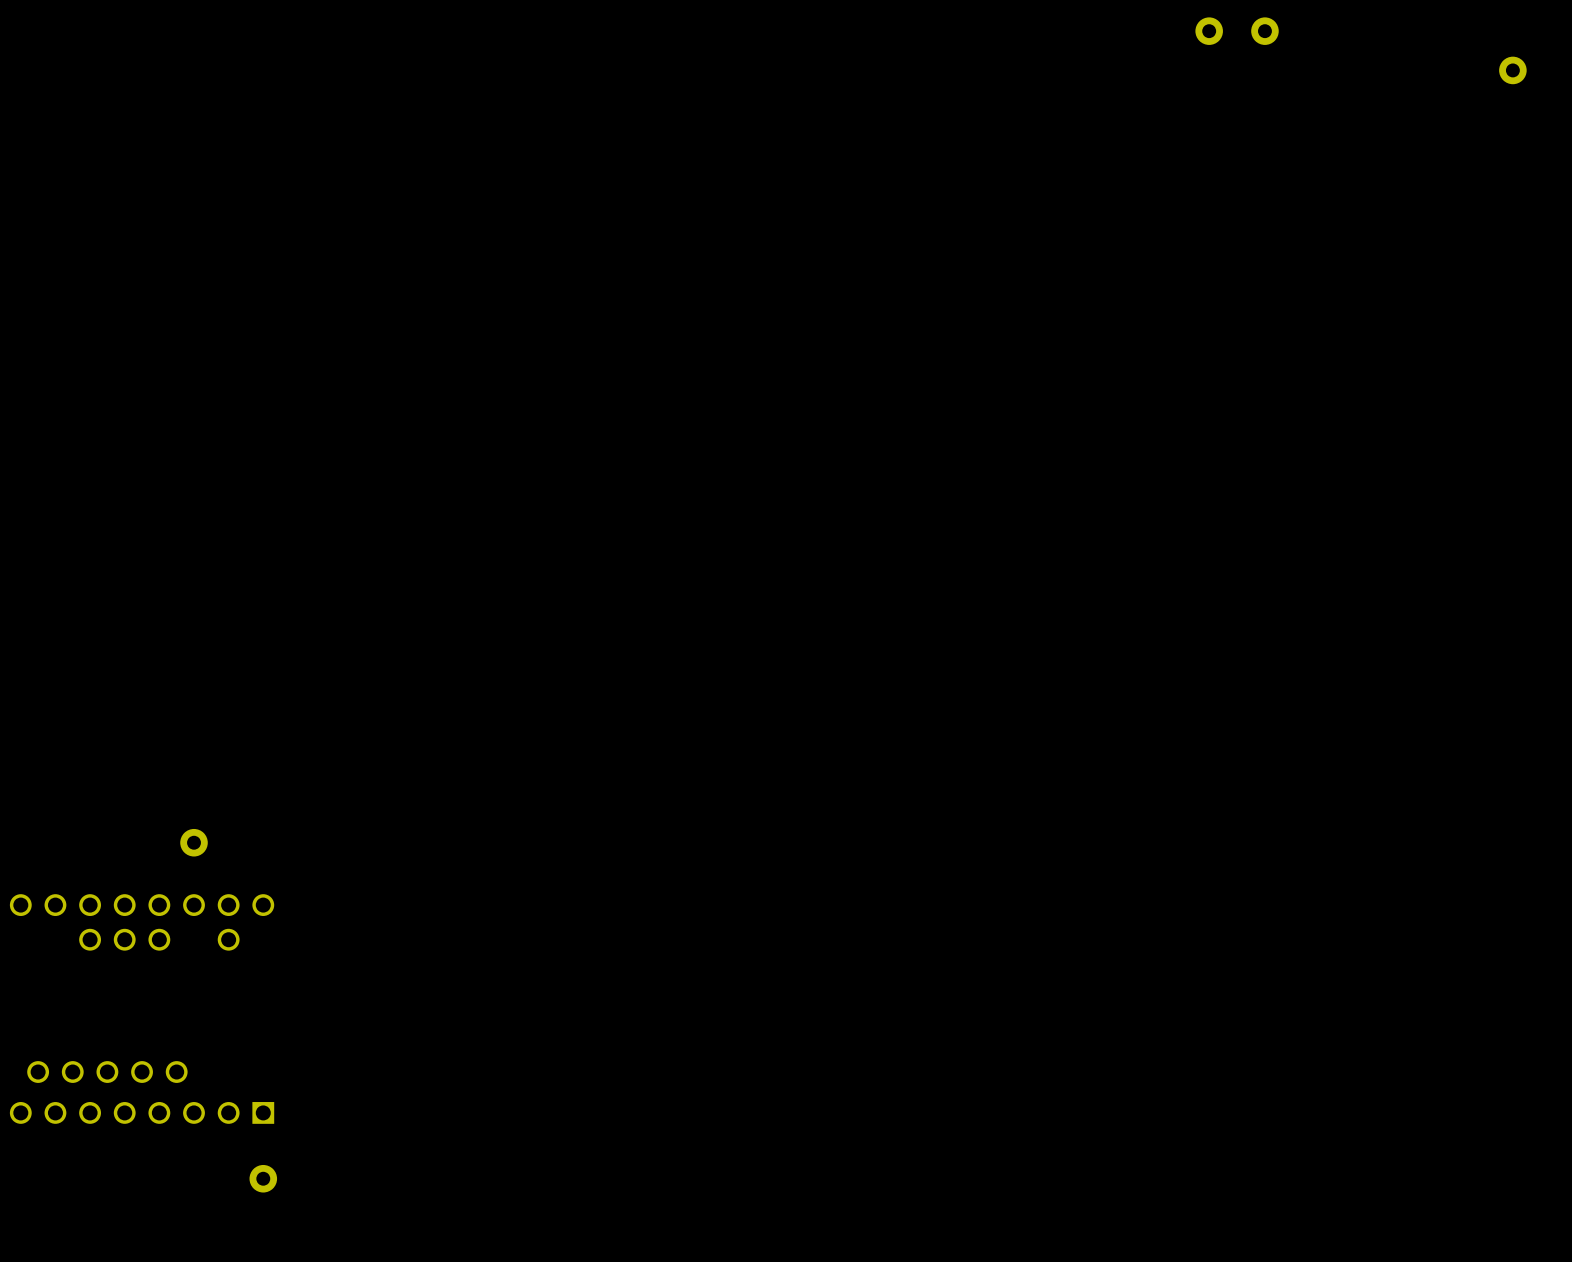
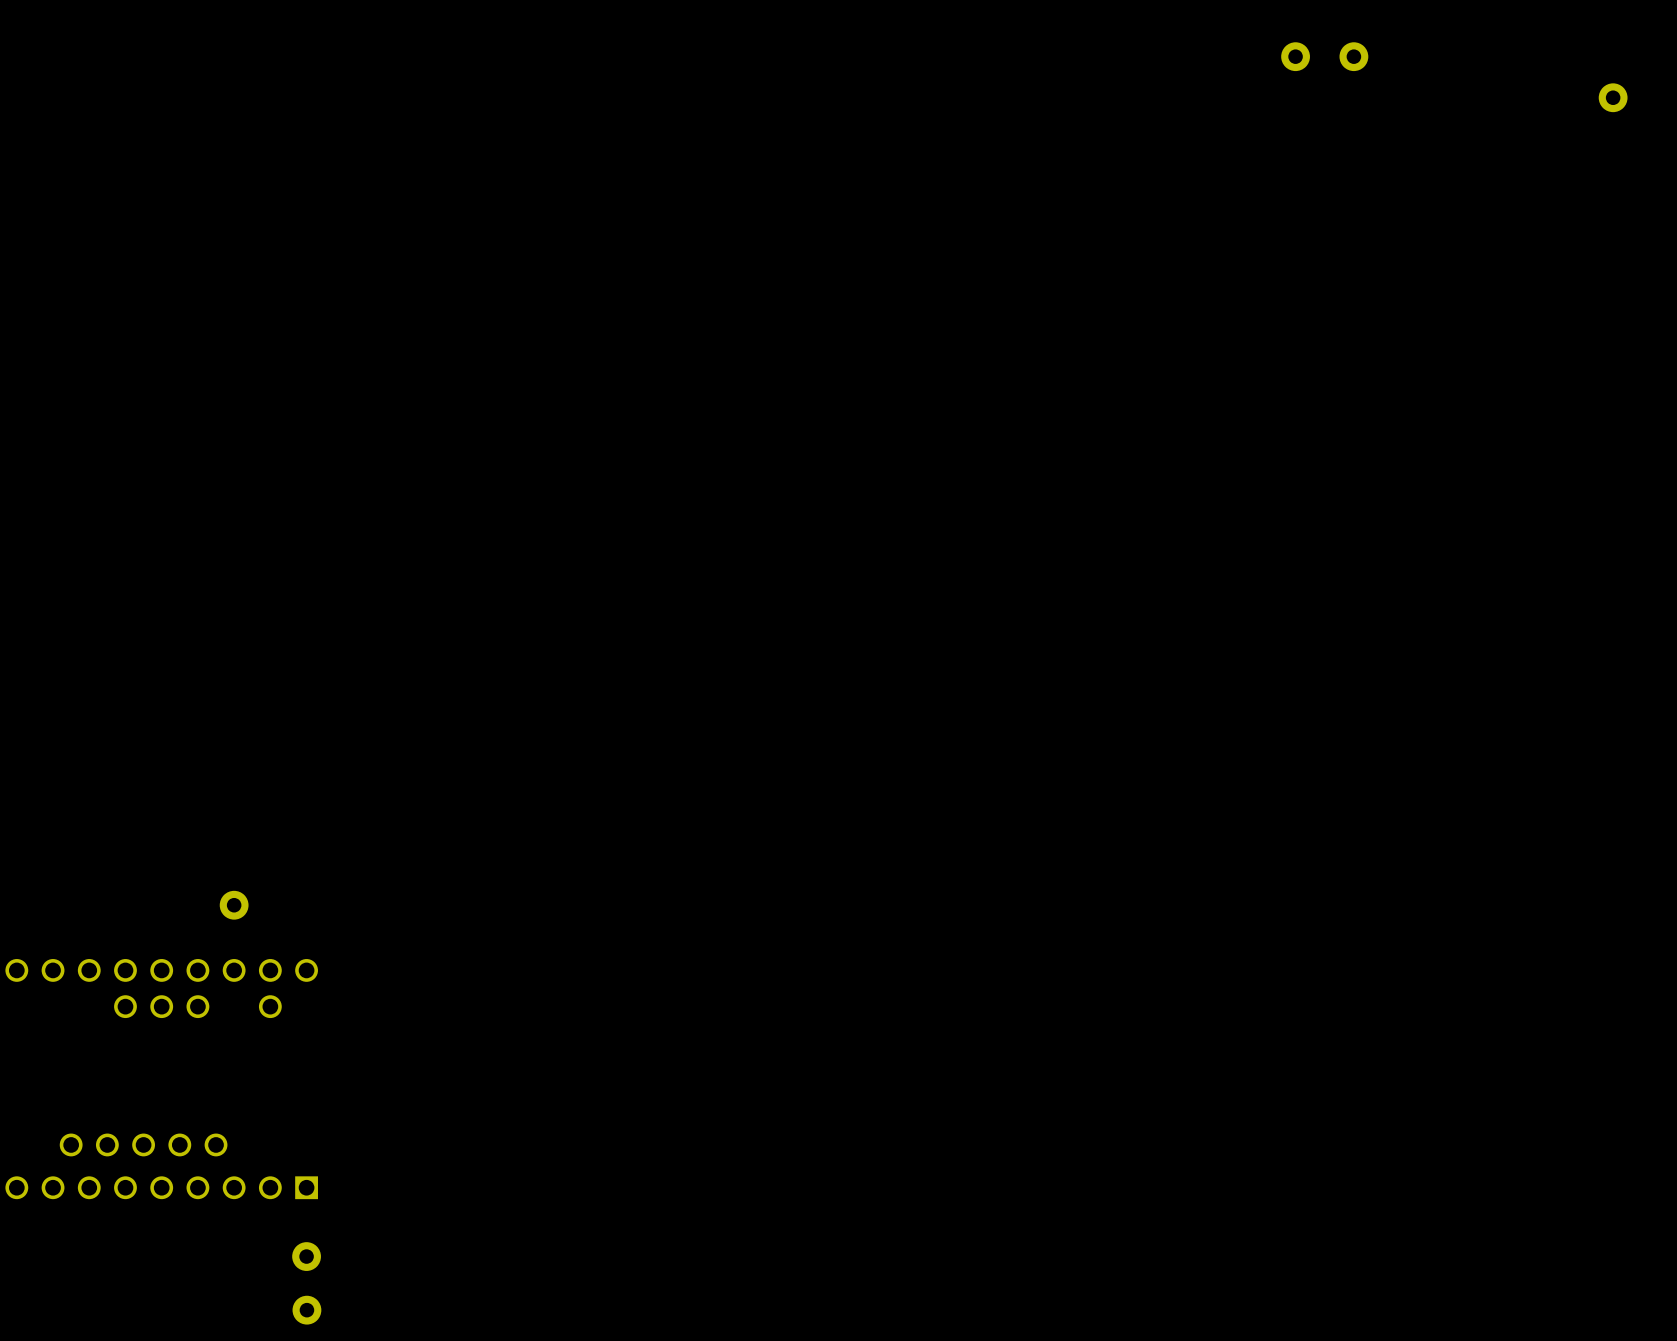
part: none -> (306, 1310)

